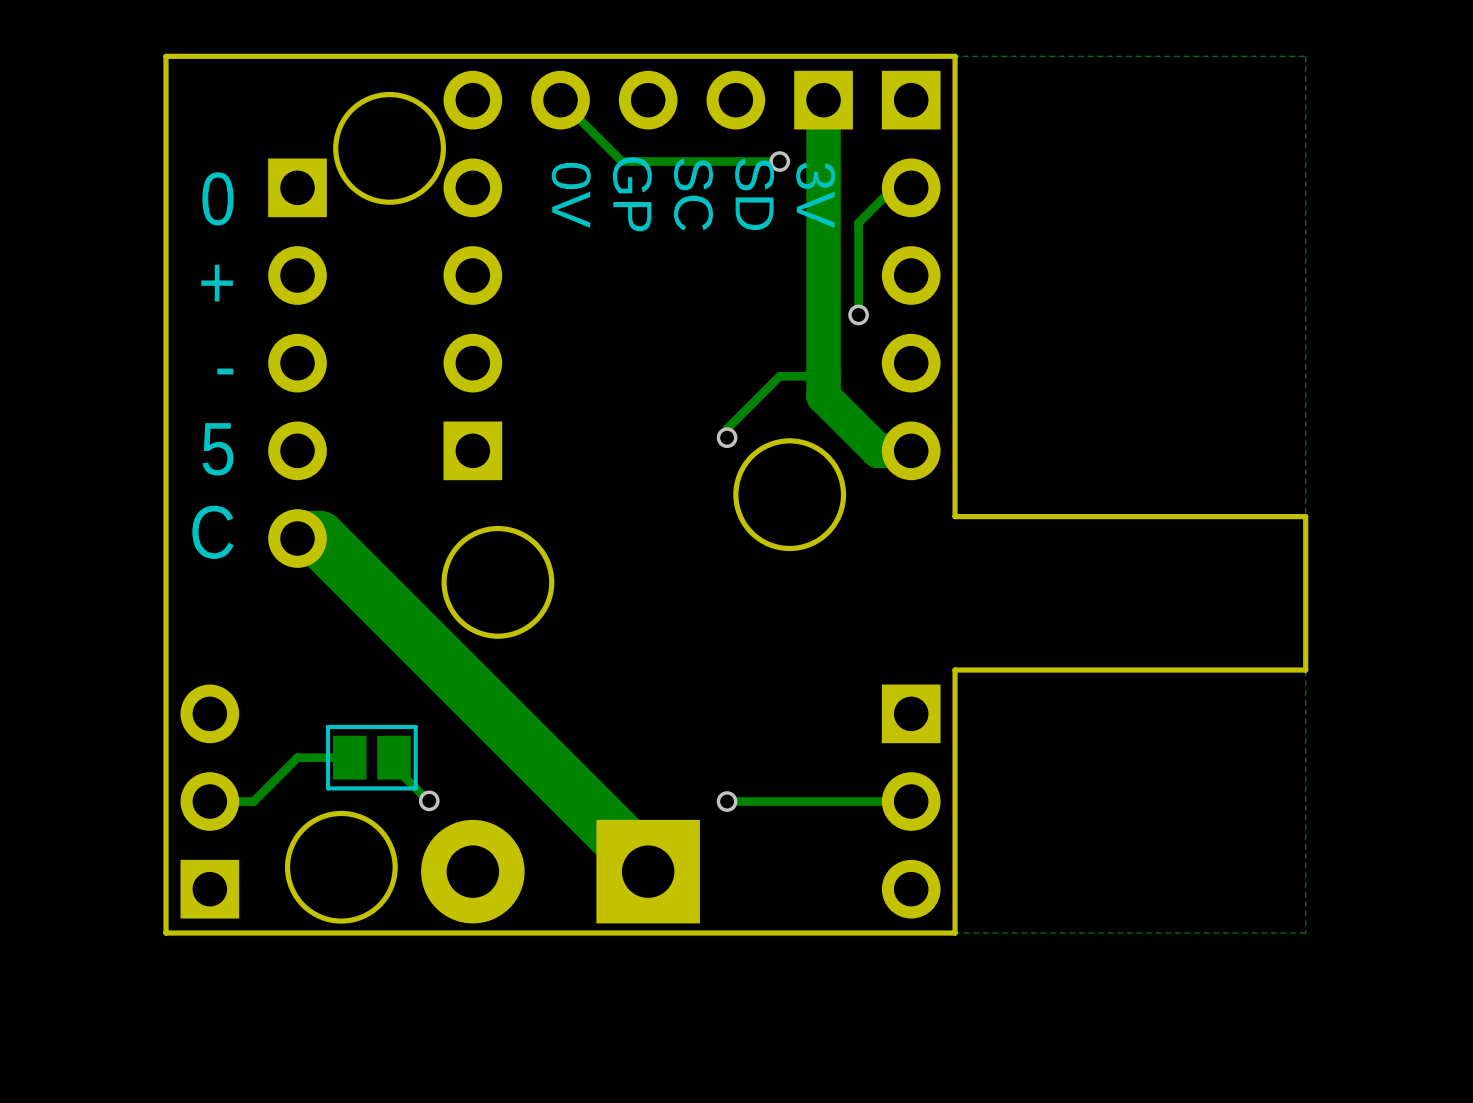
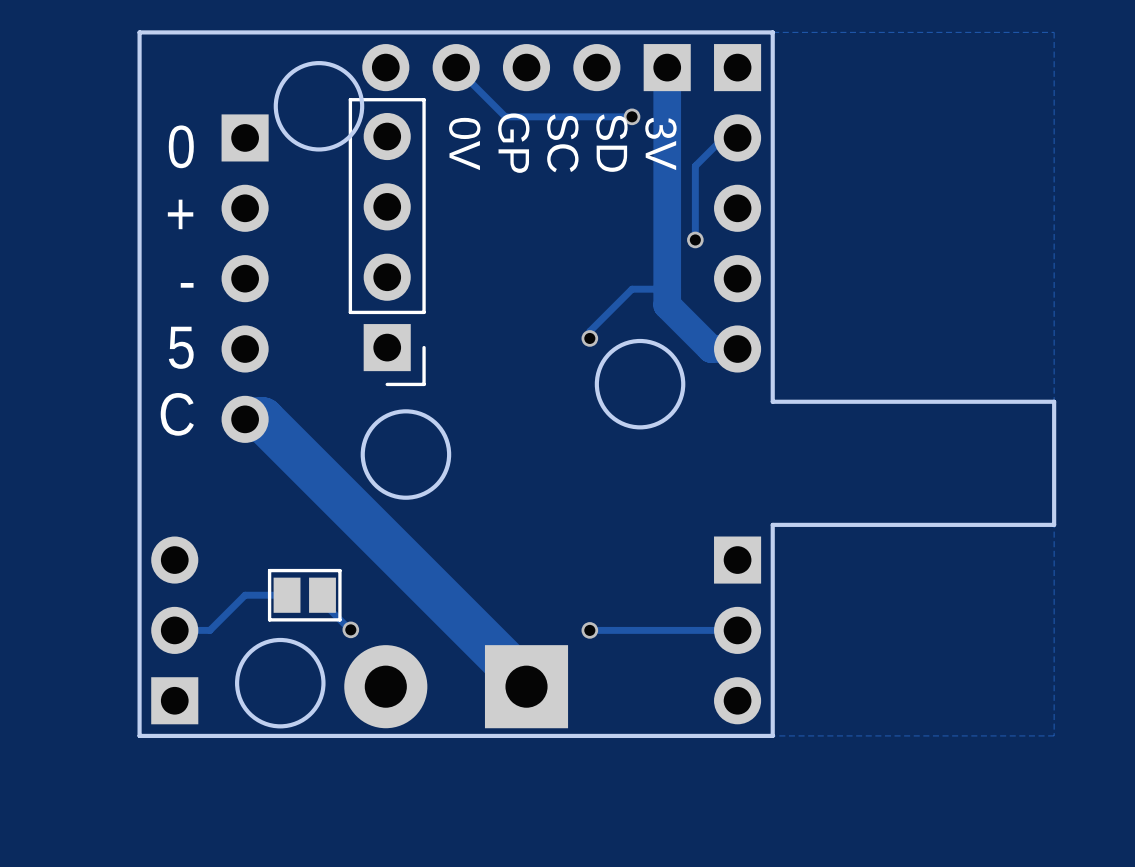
part side: top (472, 319) -> bottom (387, 242)

